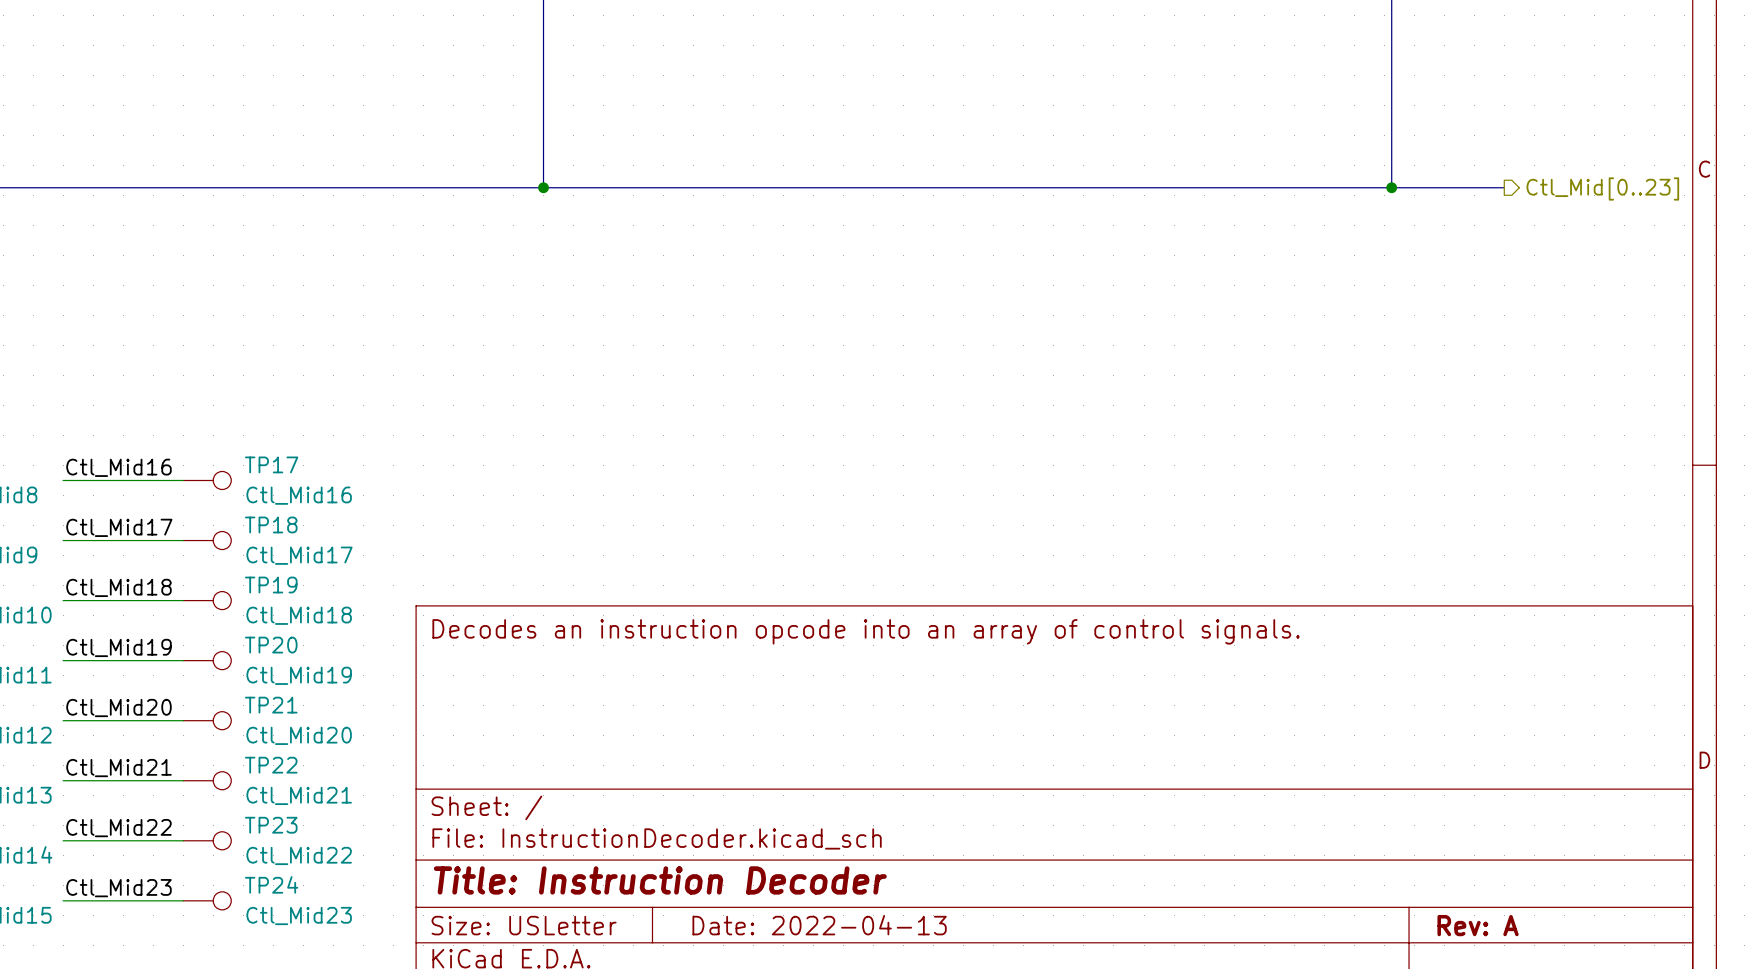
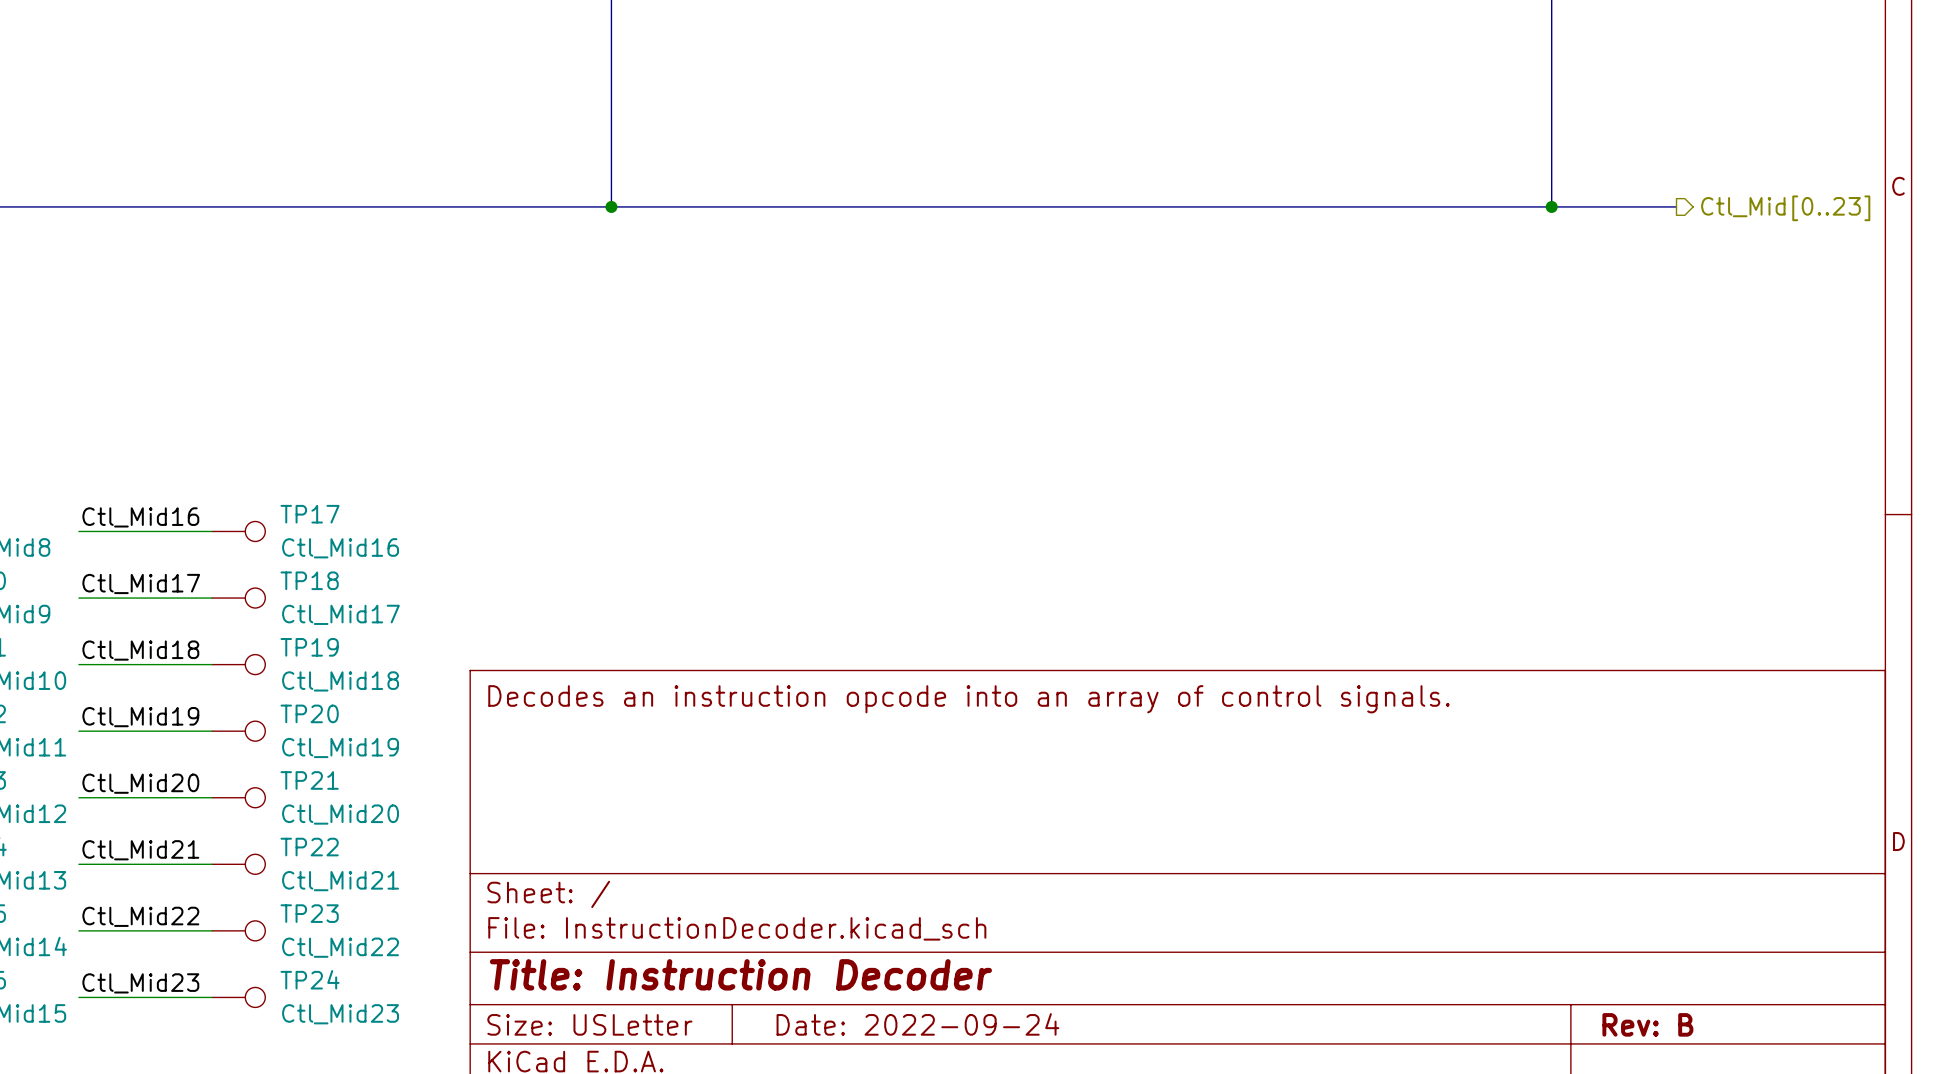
title block: Date: 2022-04-13 (819, 925) -> Date: 2022-09-24 (917, 1024)
title block: Rev: A (1478, 925) -> Rev: B (1647, 1024)

